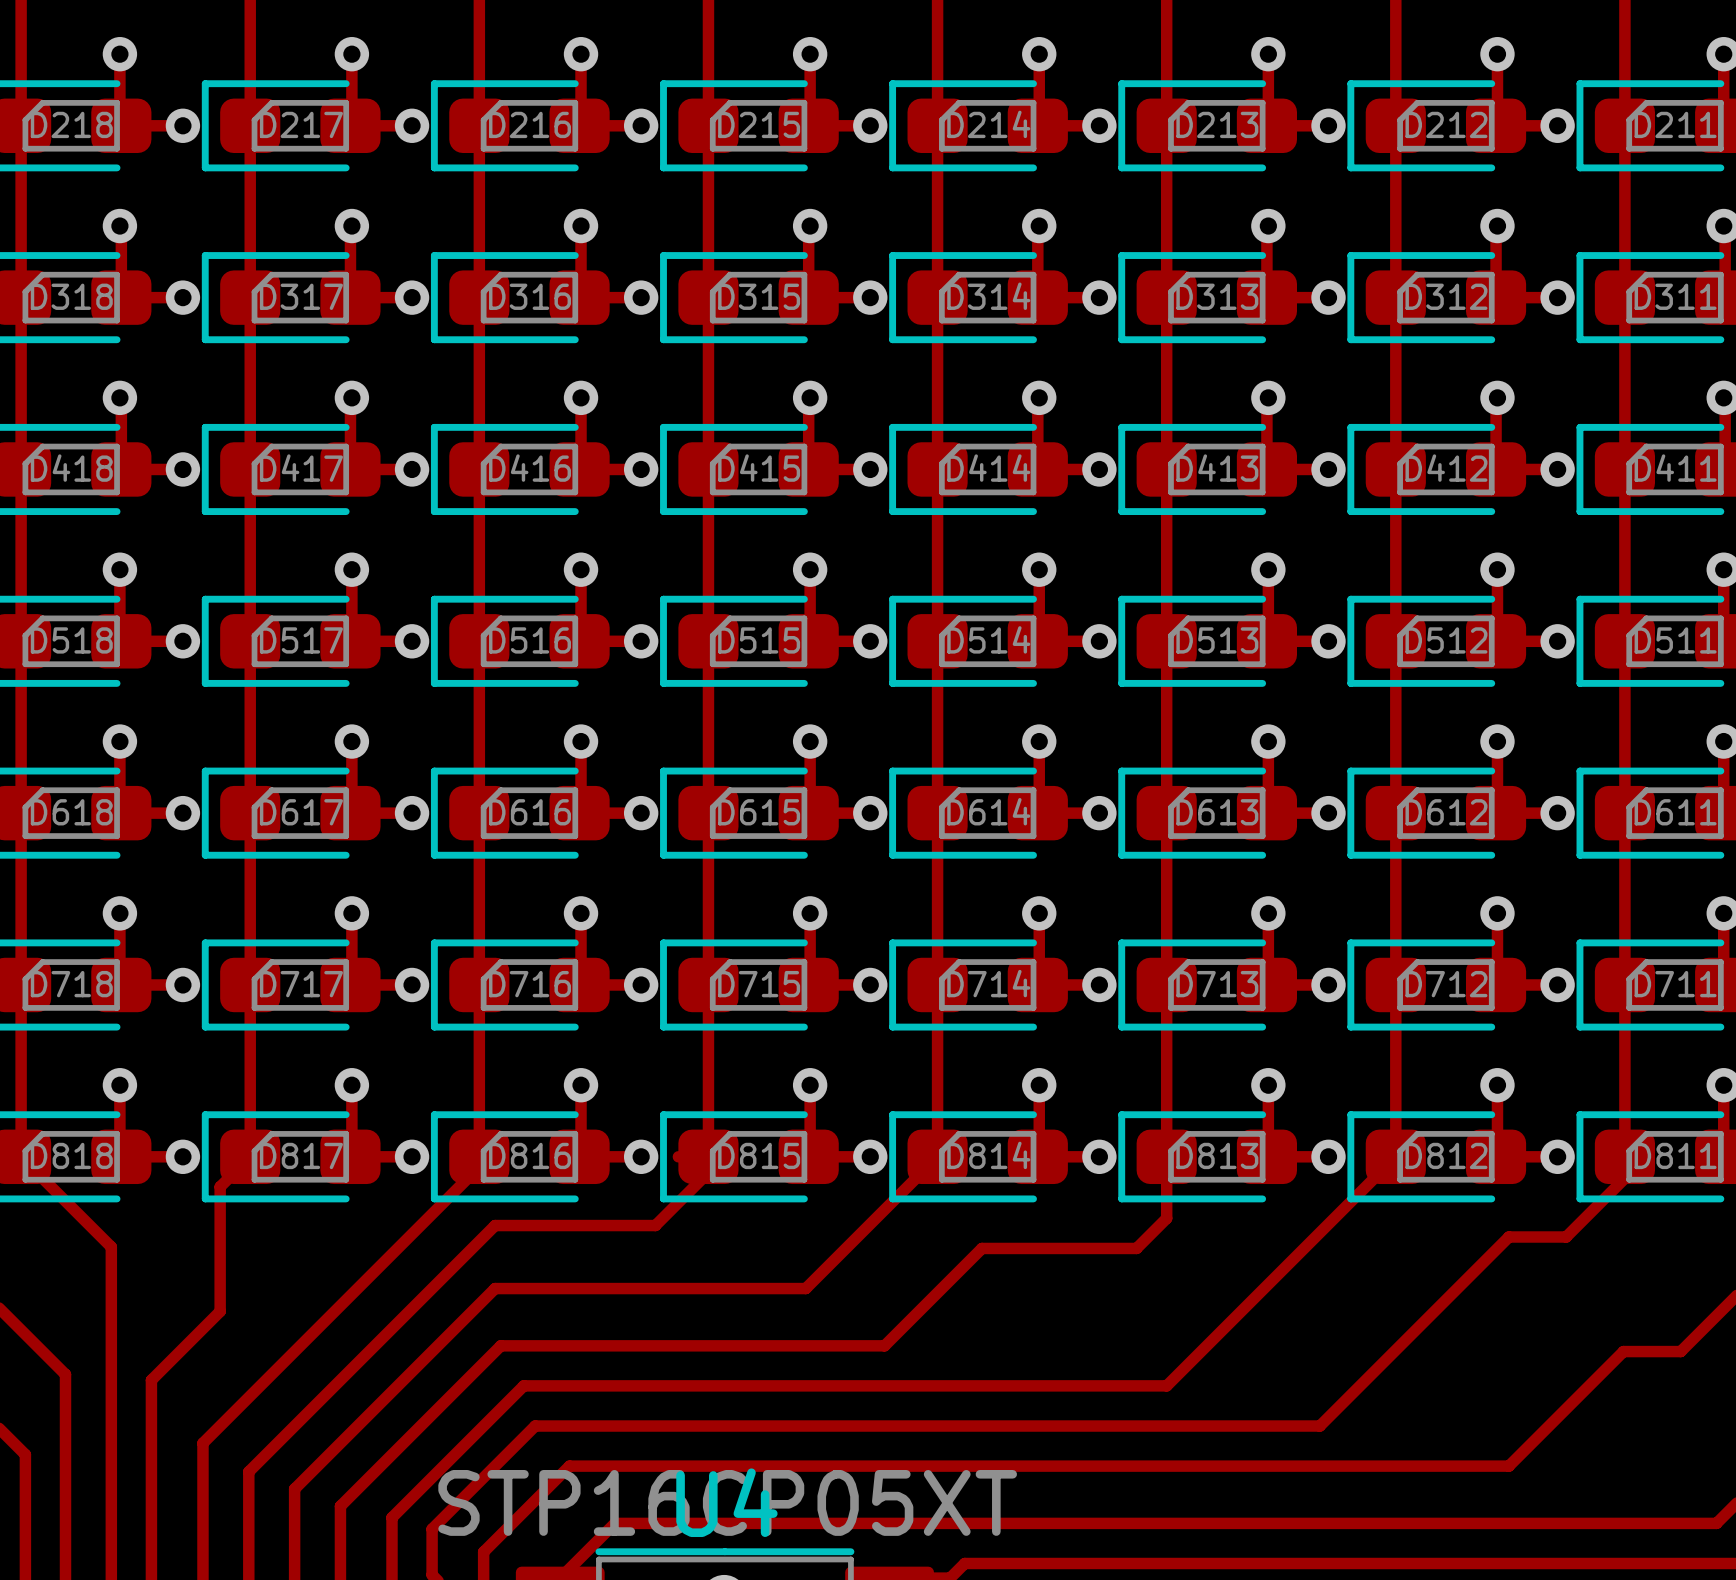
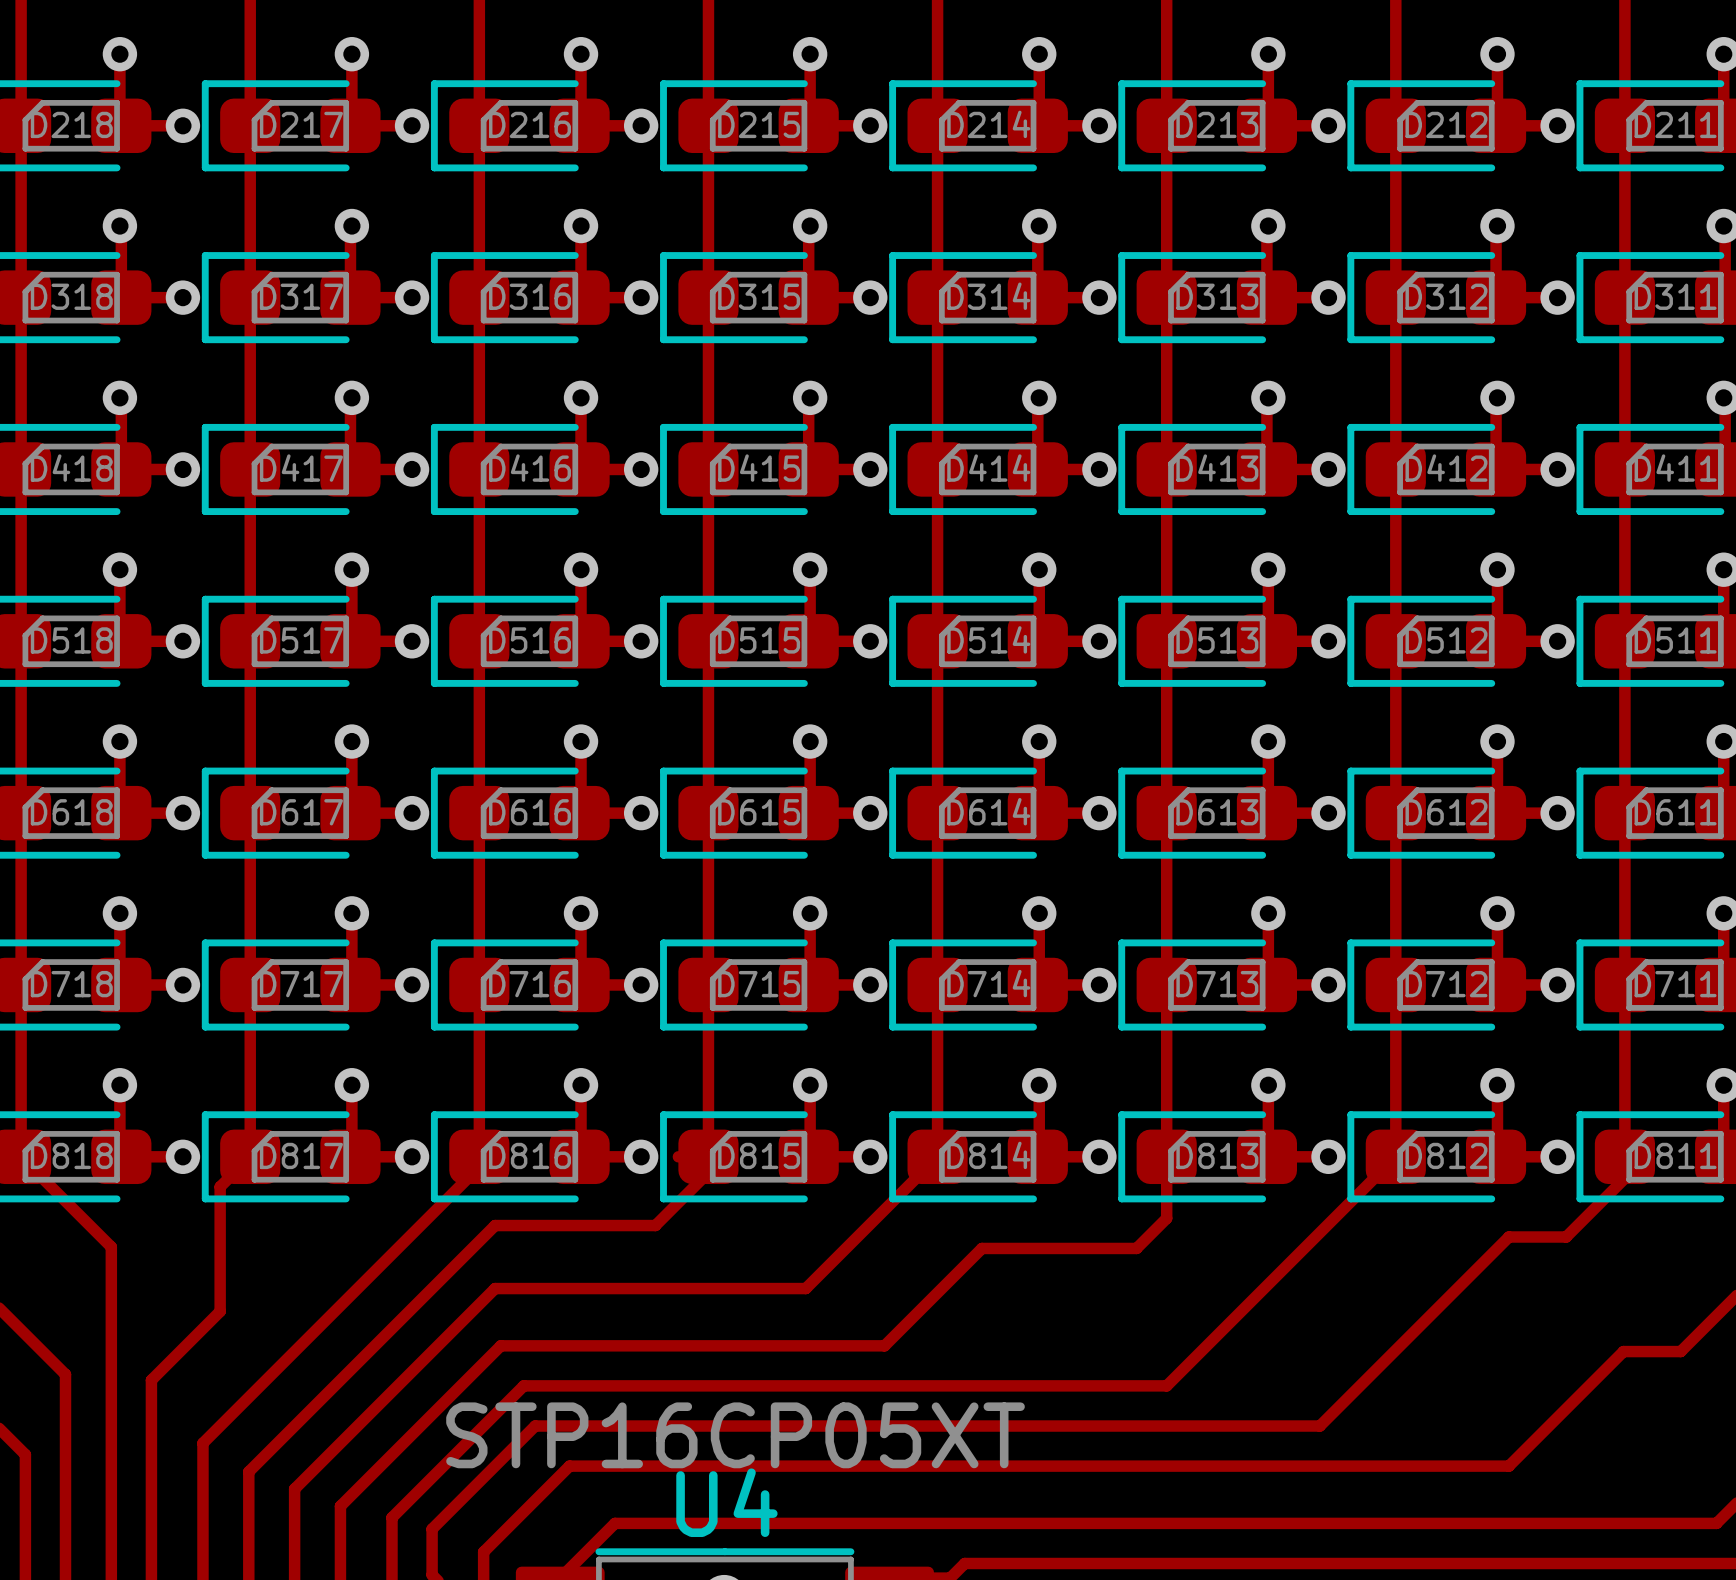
U4 value position: STP16CP05XT (727, 1502) -> STP16CP05XT (735, 1435)

